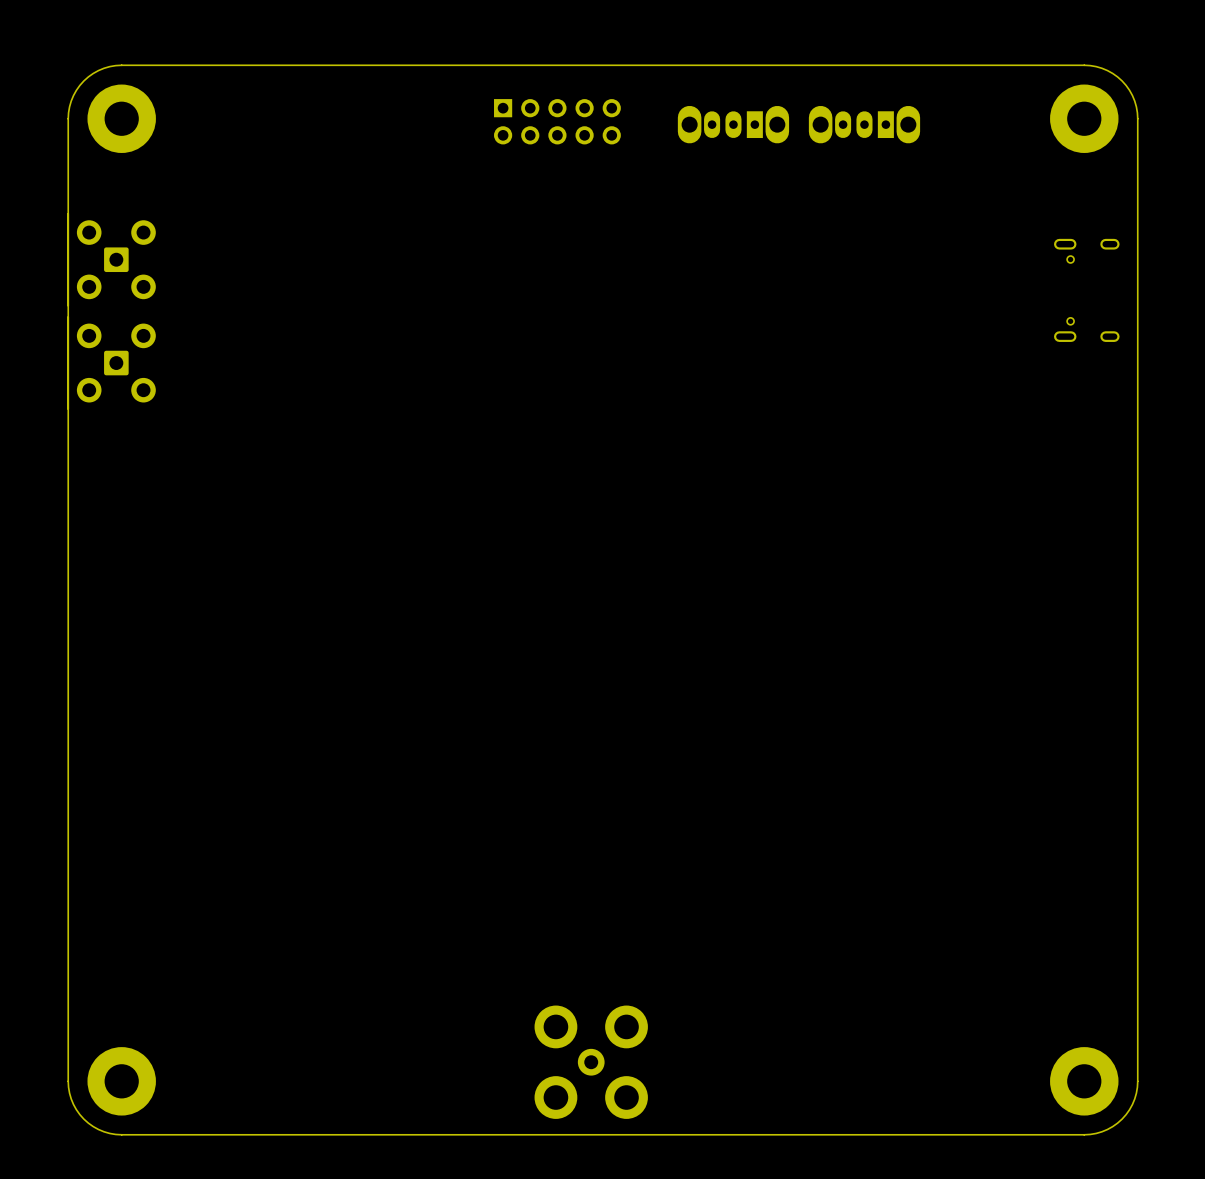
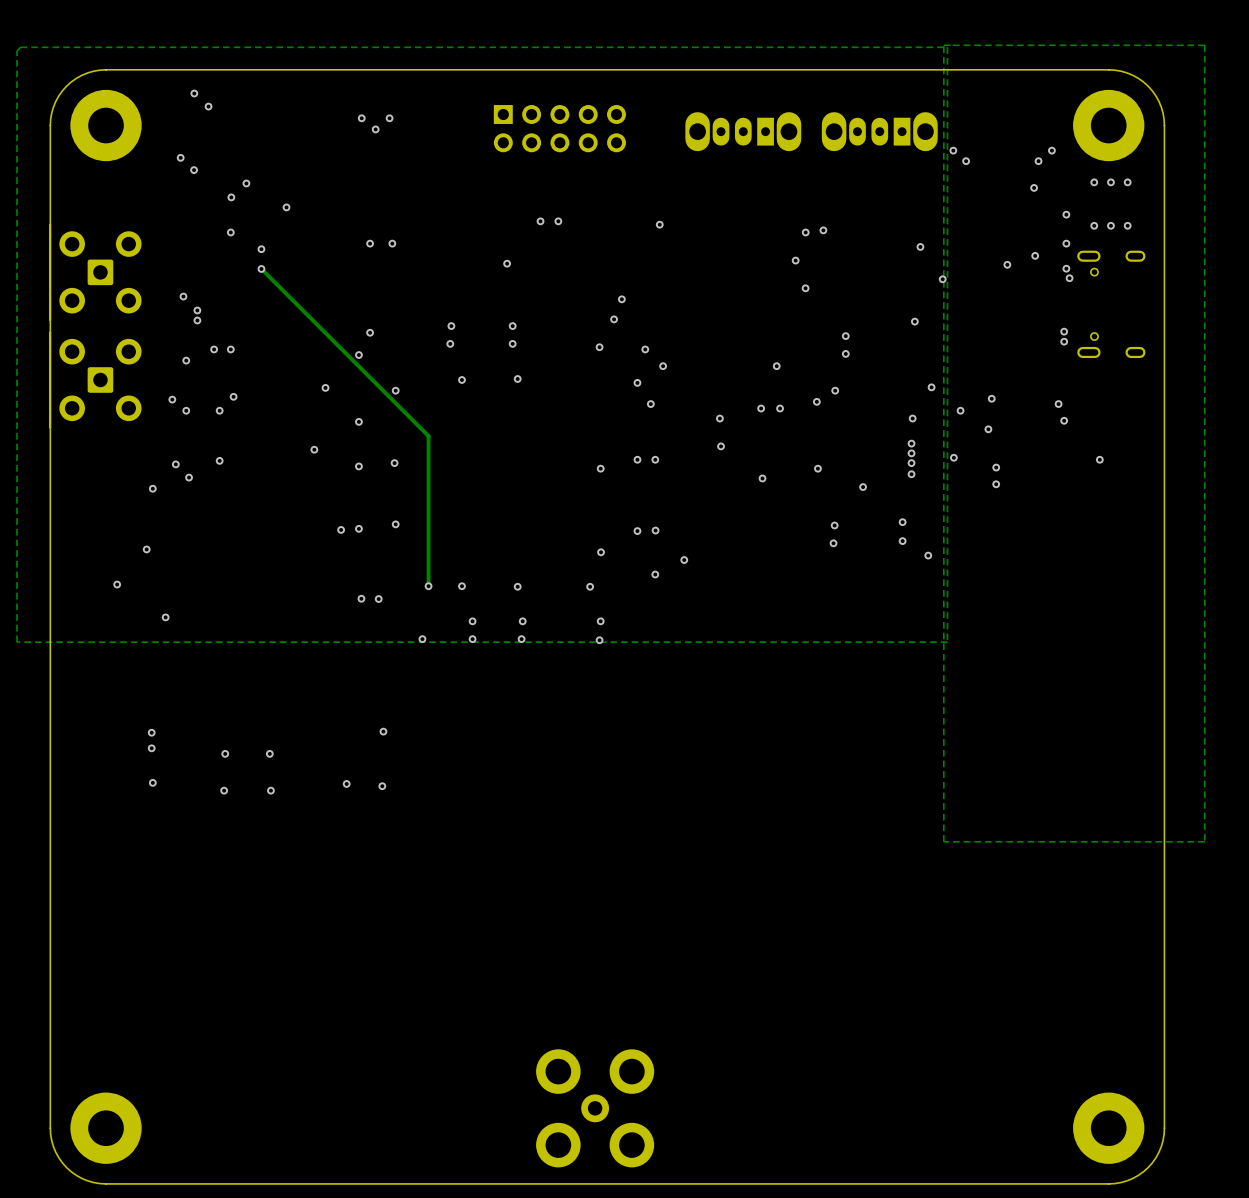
zone outline: none -> (1204, 45) (943, 45) (943, 841) (1204, 841) (1204, 45)
zone outline: none -> (947, 47) (20, 47) (16, 50) (16, 642) (947, 642) (947, 47)
via: none -> (194, 93)
via: none -> (208, 106)
via: none -> (361, 118)
via: none -> (389, 118)
via: none -> (375, 129)
via: none -> (953, 150)
via: none -> (1051, 150)
via: none -> (180, 157)
via: none -> (966, 161)
via: none -> (1038, 161)
via: none -> (194, 170)
via: none -> (1094, 182)
via: none -> (1110, 182)
via: none -> (1127, 182)
via: none -> (246, 183)
via: none -> (1034, 187)
via: none -> (231, 197)
via: none -> (286, 207)
via: none -> (1066, 214)
via: none -> (540, 221)
via: none -> (558, 221)
via: none -> (659, 224)
via: none -> (1094, 225)
via: none -> (1110, 225)
via: none -> (1127, 225)
via: none -> (823, 230)
via: none -> (230, 232)
via: none -> (805, 232)
via: none -> (370, 243)
via: none -> (392, 243)
via: none -> (1066, 243)
via: none -> (920, 246)
via: none -> (261, 249)
via: none -> (1035, 255)
via: none -> (795, 260)
via: none -> (507, 263)
via: none -> (1007, 264)
track: none -> (261, 268) (428, 436) (428, 586)
via: none -> (261, 268)
via: none -> (1066, 268)
via: none -> (1069, 278)
via: none -> (942, 279)
via: none -> (805, 288)
via: none -> (183, 296)
via: none -> (621, 299)
via: none -> (197, 310)
via: none -> (614, 319)
via: none -> (197, 320)
via: none -> (914, 321)
via: none -> (451, 326)
via: none -> (512, 326)
via: none -> (1064, 331)
via: none -> (370, 332)
via: none -> (845, 336)
via: none -> (1064, 341)
via: none -> (450, 343)
via: none -> (512, 343)
via: none -> (599, 347)
via: none -> (214, 349)
via: none -> (230, 349)
via: none -> (645, 349)
via: none -> (845, 353)
via: none -> (358, 355)
via: none -> (186, 360)
via: none -> (663, 366)
via: none -> (776, 366)
via: none -> (517, 378)
via: none -> (461, 379)
via: none -> (637, 382)
via: none -> (325, 387)
via: none -> (931, 387)
via: none -> (395, 390)
via: none -> (835, 390)
via: none -> (233, 396)
via: none -> (172, 399)
via: none -> (991, 398)
via: none -> (816, 401)
via: none -> (650, 404)
via: none -> (1058, 404)
via: none -> (761, 408)
via: none -> (780, 408)
via: none -> (186, 410)
via: none -> (219, 410)
via: none -> (960, 410)
via: none -> (719, 418)
via: none -> (912, 418)
via: none -> (1064, 420)
via: none -> (358, 421)
via: none -> (988, 429)
via: none -> (911, 443)
via: none -> (721, 446)
via: none -> (314, 449)
via: none -> (911, 453)
via: none -> (953, 457)
via: none -> (637, 459)
via: none -> (655, 459)
via: none -> (1099, 459)
via: none -> (219, 460)
via: none -> (394, 463)
via: none -> (911, 463)
via: none -> (175, 464)
via: none -> (358, 466)
via: none -> (996, 467)
via: none -> (600, 468)
via: none -> (817, 468)
via: none -> (911, 474)
via: none -> (189, 477)
via: none -> (762, 478)
via: none -> (996, 484)
via: none -> (863, 487)
via: none -> (152, 488)
via: none -> (902, 522)
via: none -> (395, 524)
via: none -> (834, 525)
via: none -> (358, 528)
via: none -> (341, 529)
via: none -> (655, 530)
via: none -> (637, 531)
via: none -> (902, 541)
via: none -> (833, 543)
via: none -> (146, 549)
via: none -> (601, 552)
via: none -> (928, 555)
via: none -> (684, 560)
via: none -> (655, 574)
via: none -> (117, 584)
via: none -> (428, 586)
via: none -> (461, 586)
via: none -> (517, 586)
via: none -> (590, 586)
via: none -> (361, 598)
via: none -> (378, 599)
via: none -> (165, 617)
via: none -> (472, 621)
via: none -> (522, 621)
via: none -> (600, 621)
via: none -> (422, 639)
via: none -> (472, 639)
via: none -> (521, 639)
via: none -> (599, 640)
via: none -> (383, 731)
via: none -> (151, 732)
via: none -> (151, 748)
via: none -> (225, 753)
via: none -> (269, 753)
via: none -> (152, 782)
via: none -> (346, 783)
via: none -> (382, 786)
via: none -> (224, 790)
via: none -> (270, 790)

